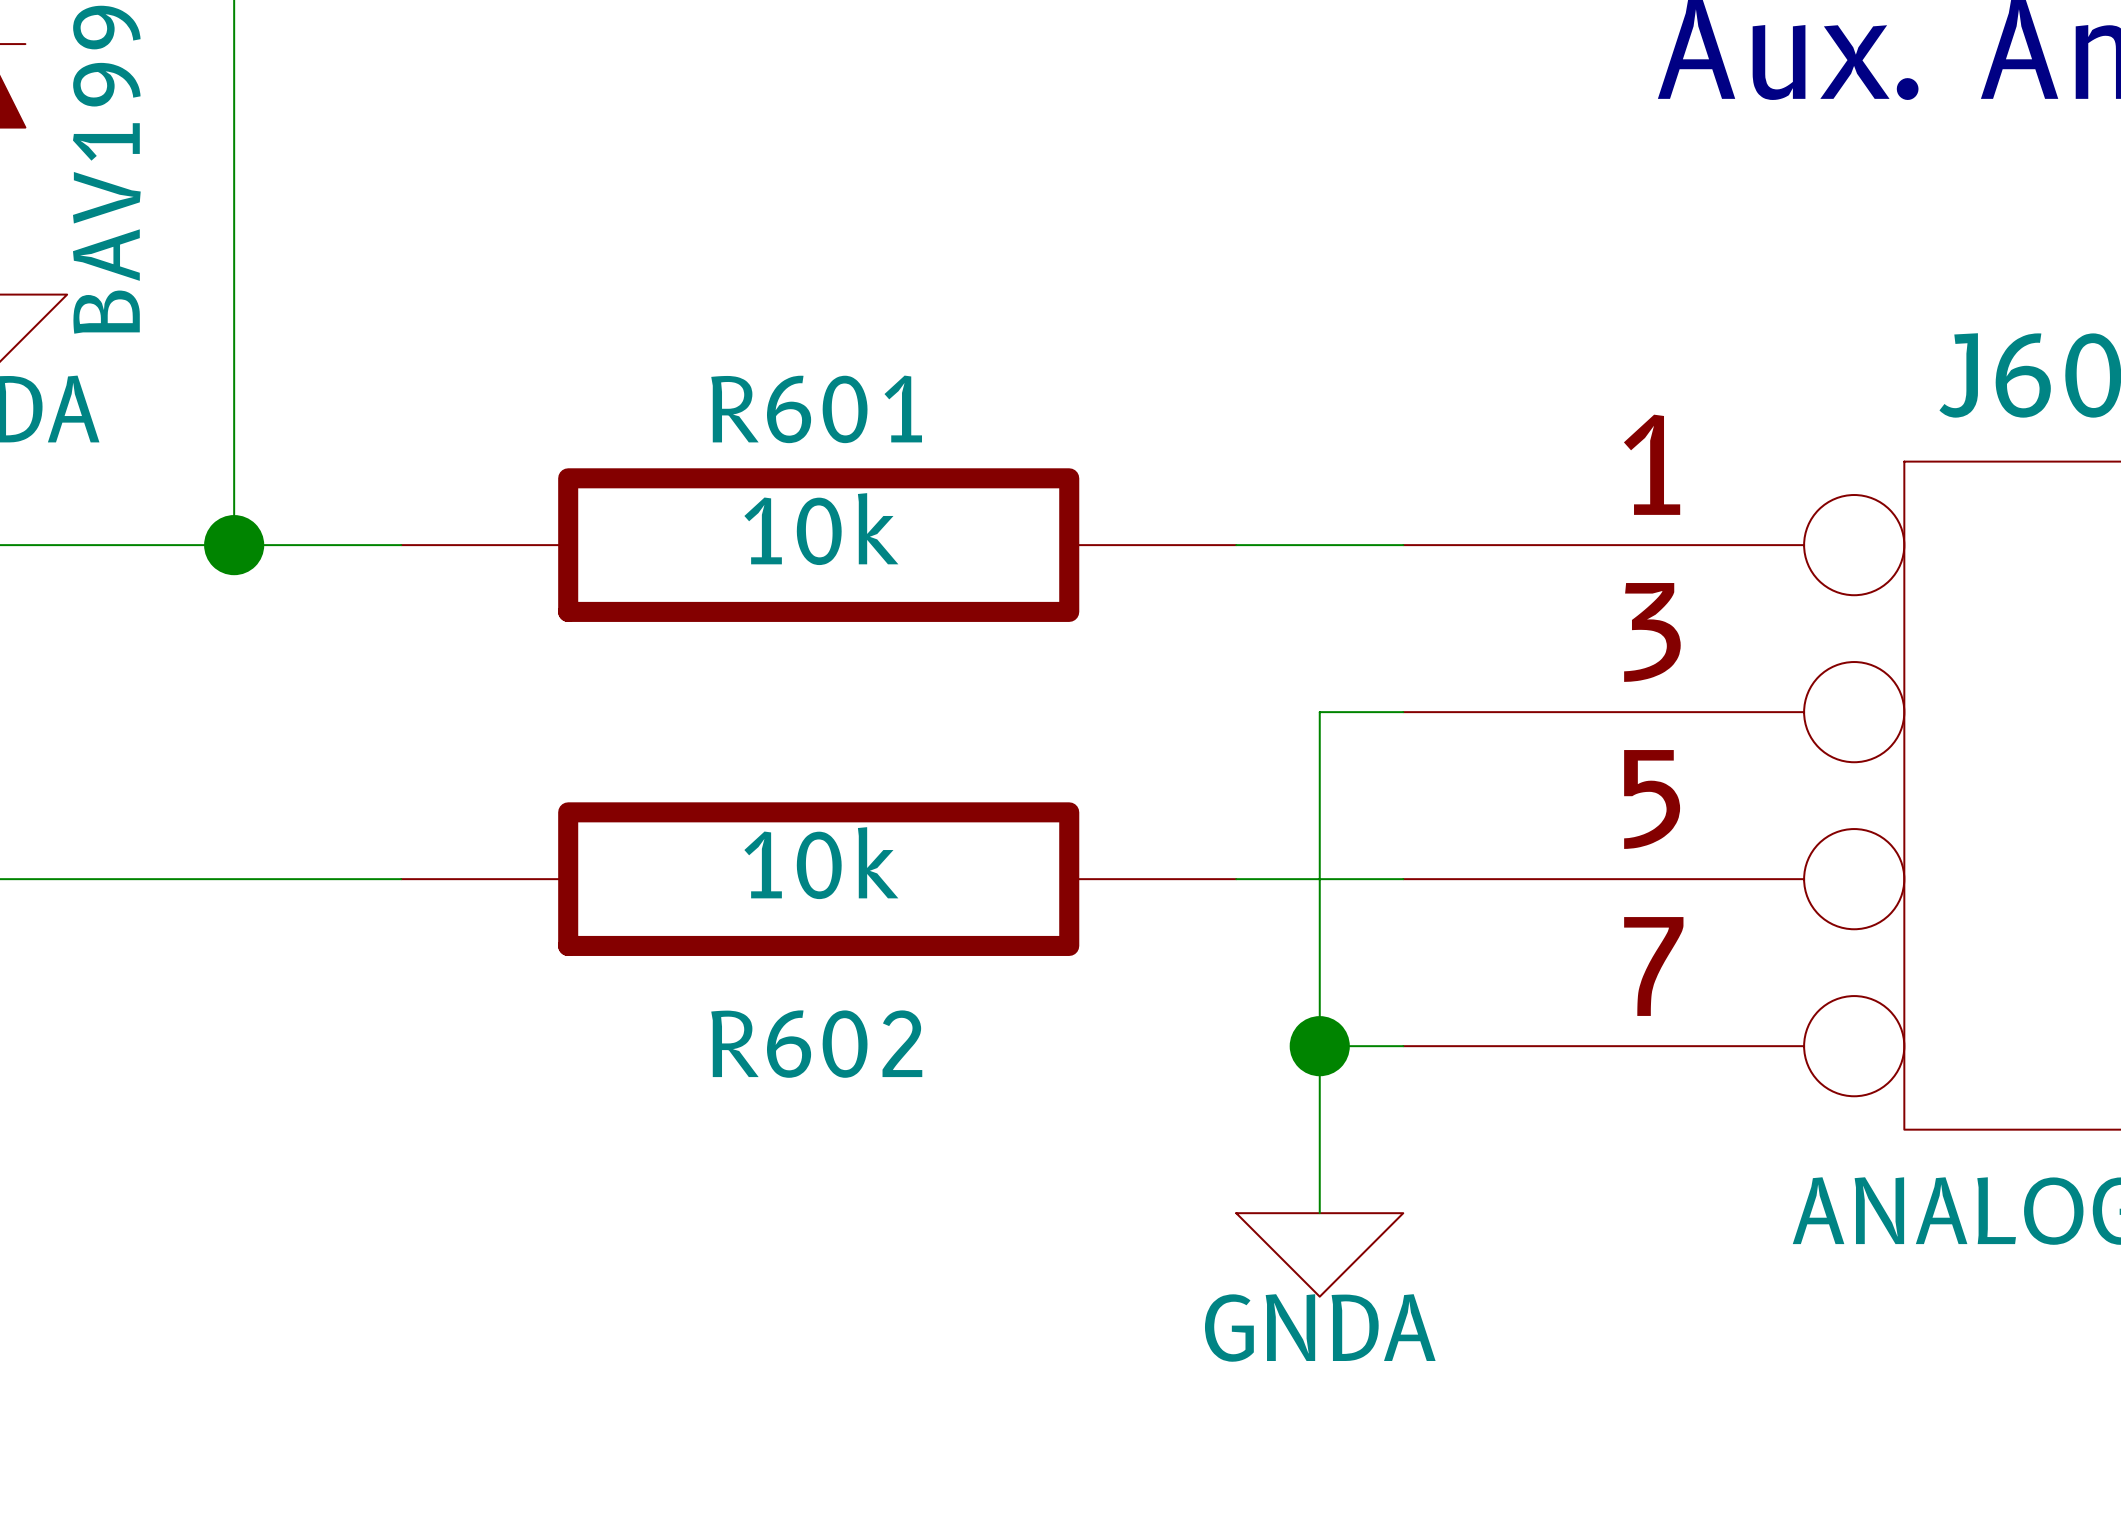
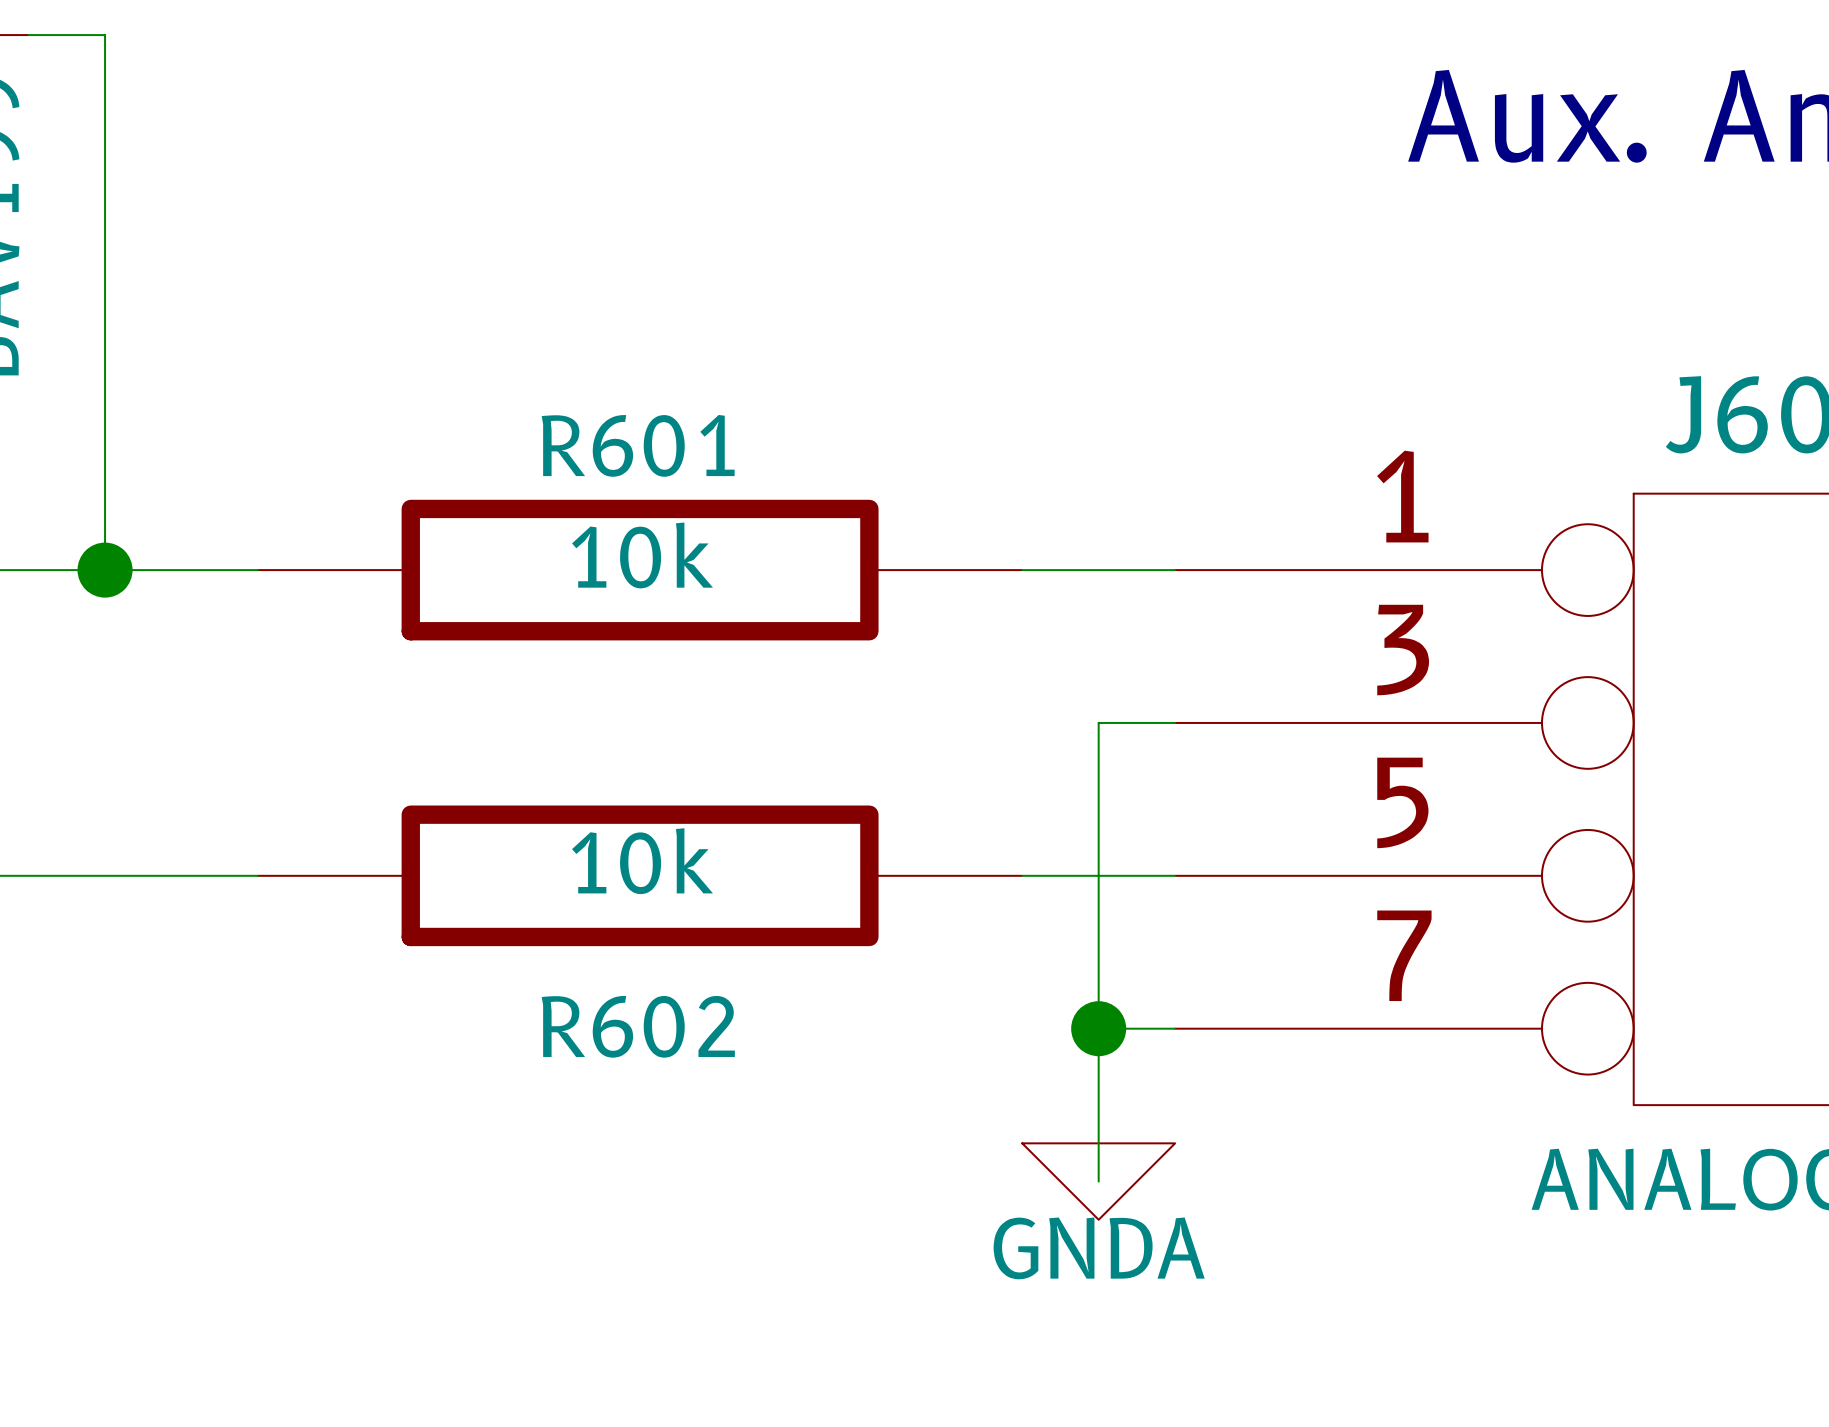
power symbol position: GNDA (1319, 1254) -> GNDA (1098, 1181)

